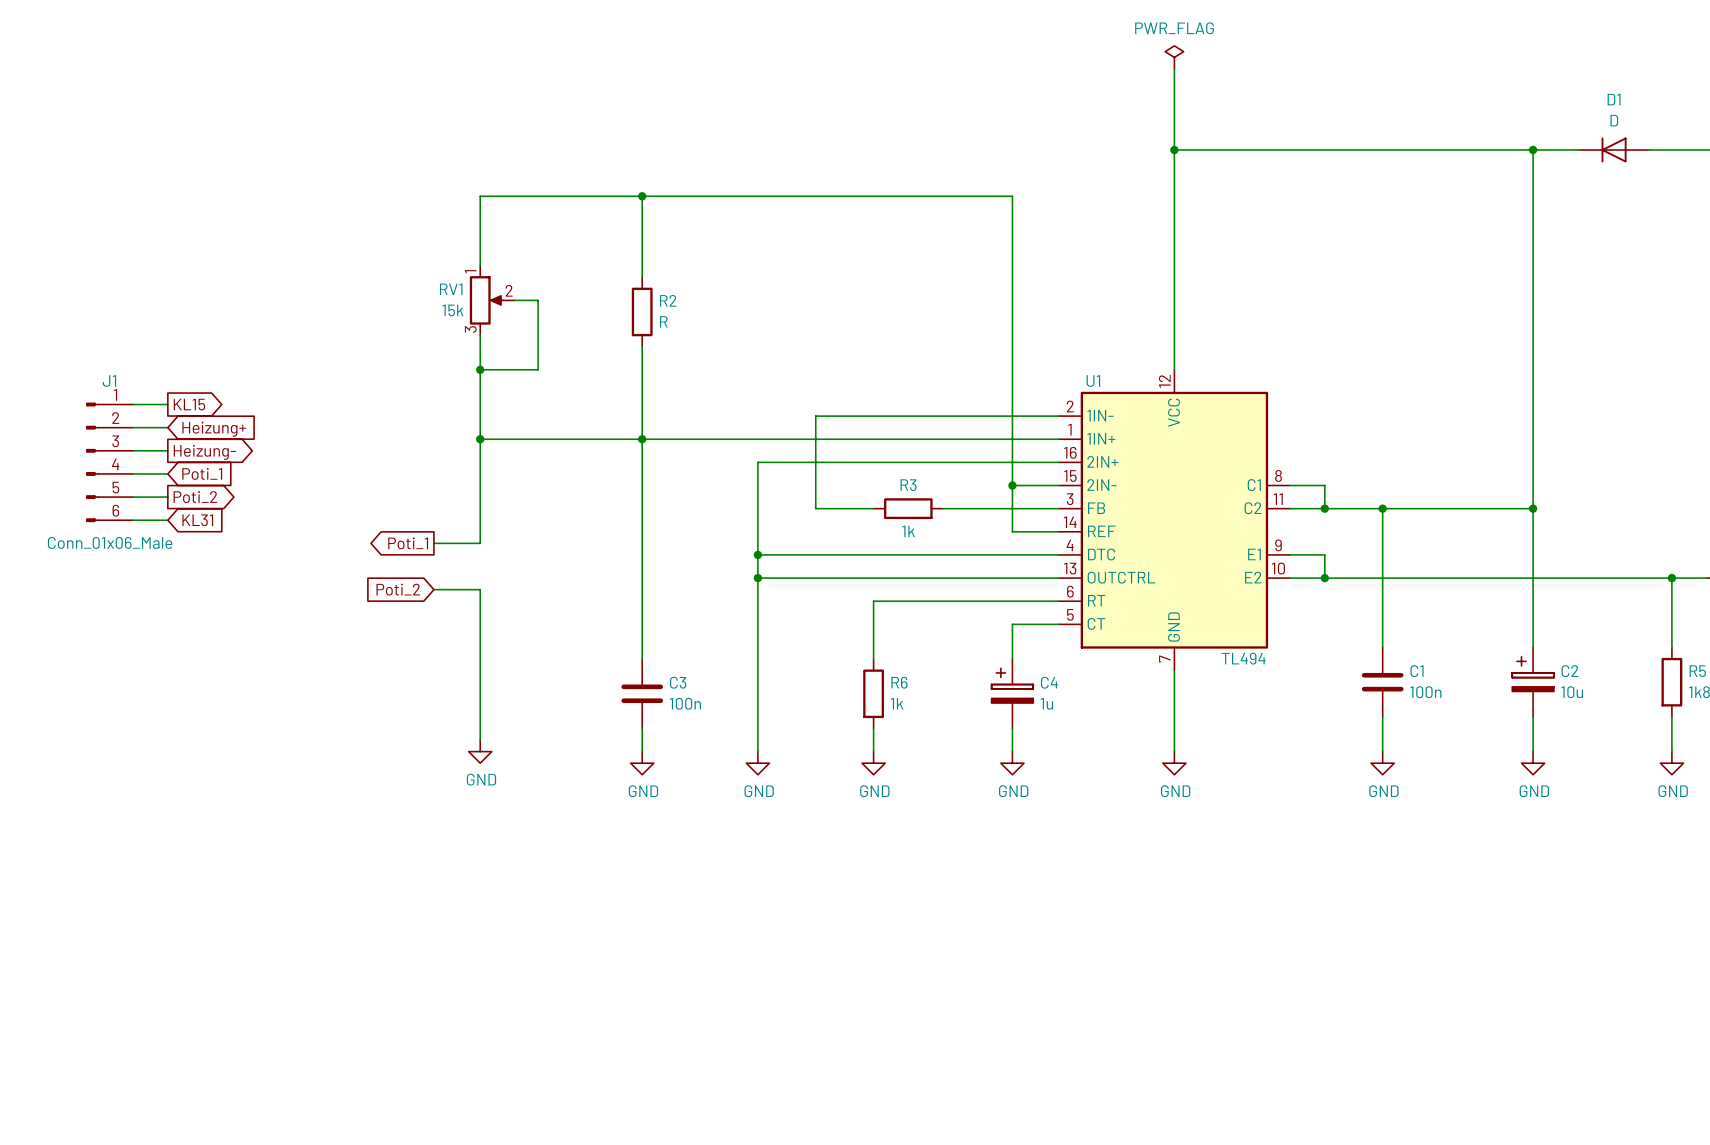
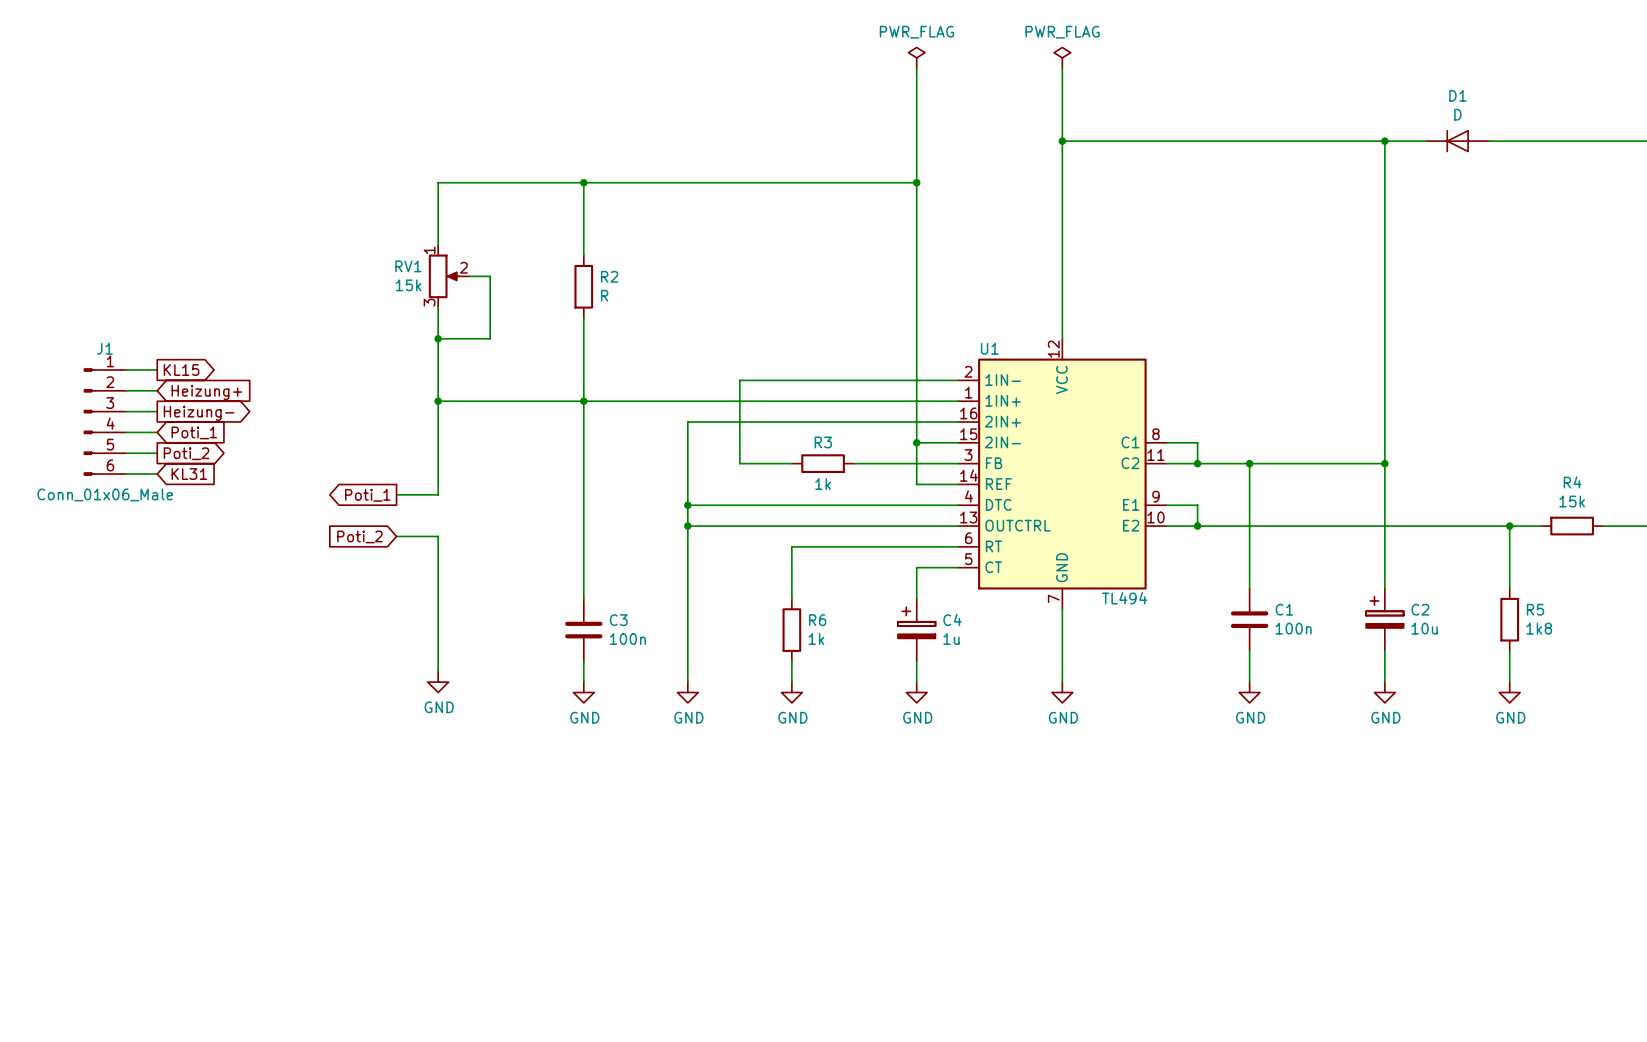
power symbol: none -> PWR_FLAG (916, 57)
wire: none -> (916, 68) (916, 182)
junction: none -> (916, 182)

